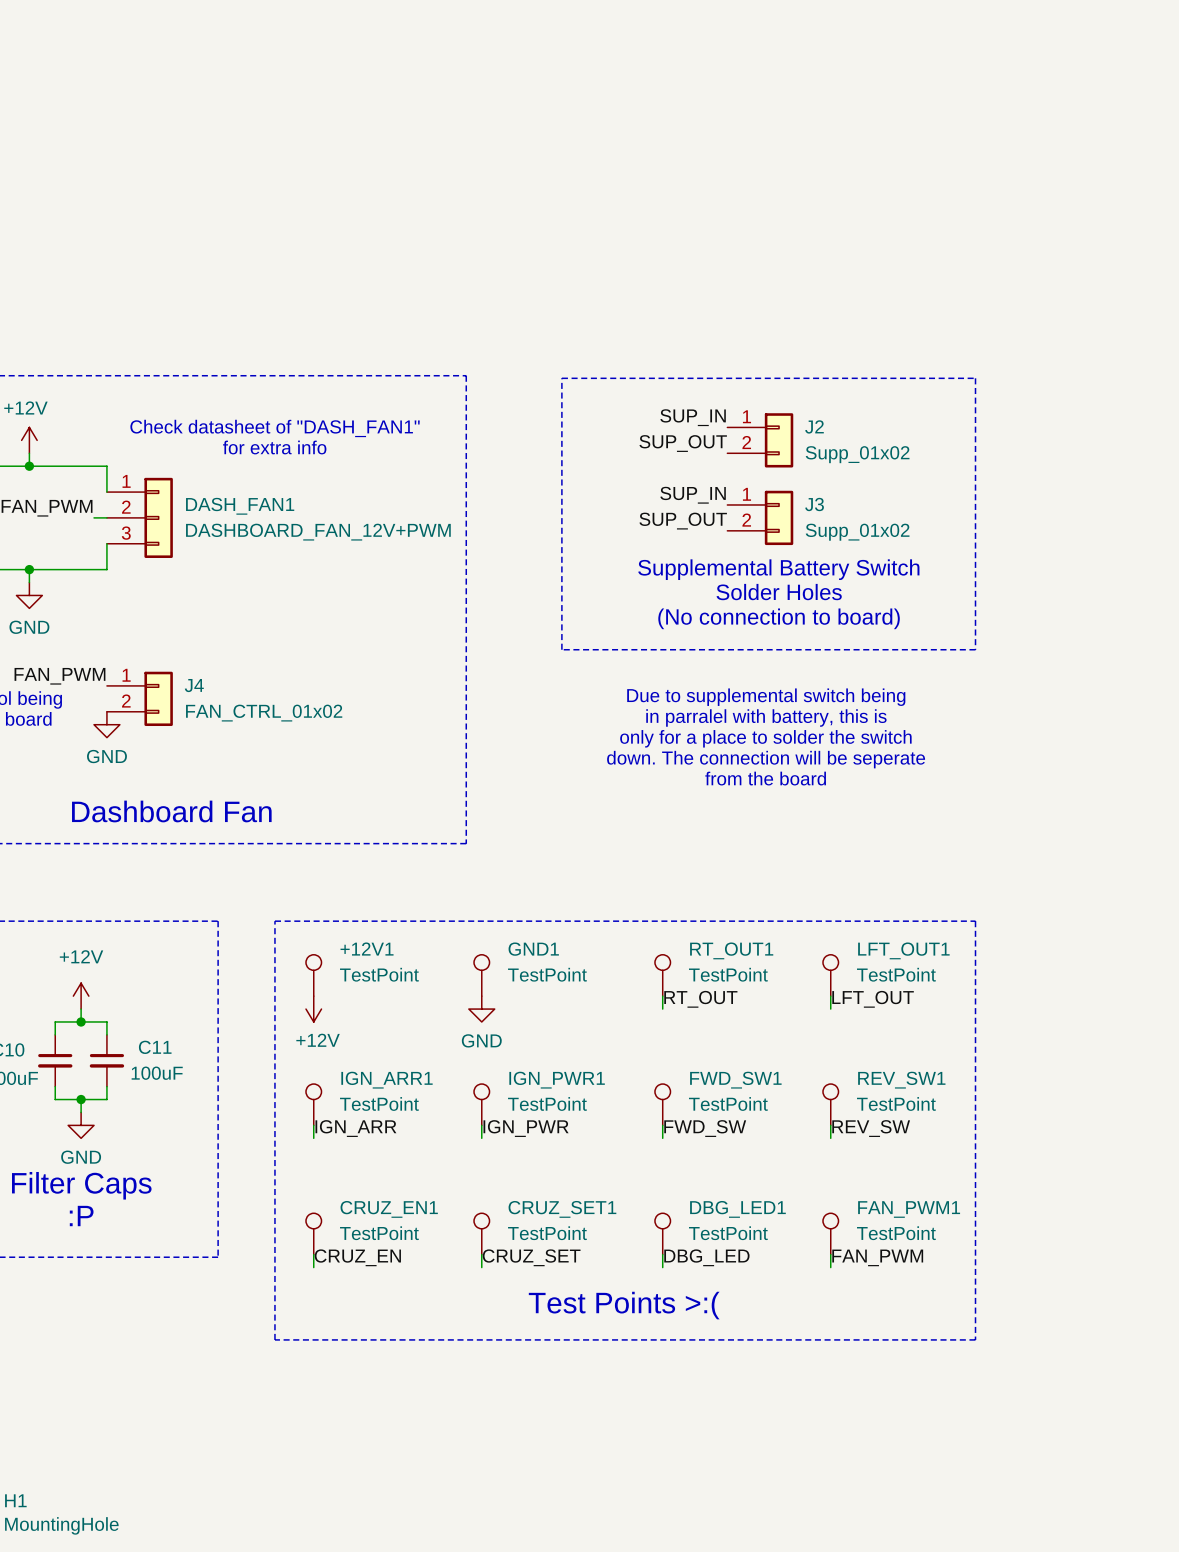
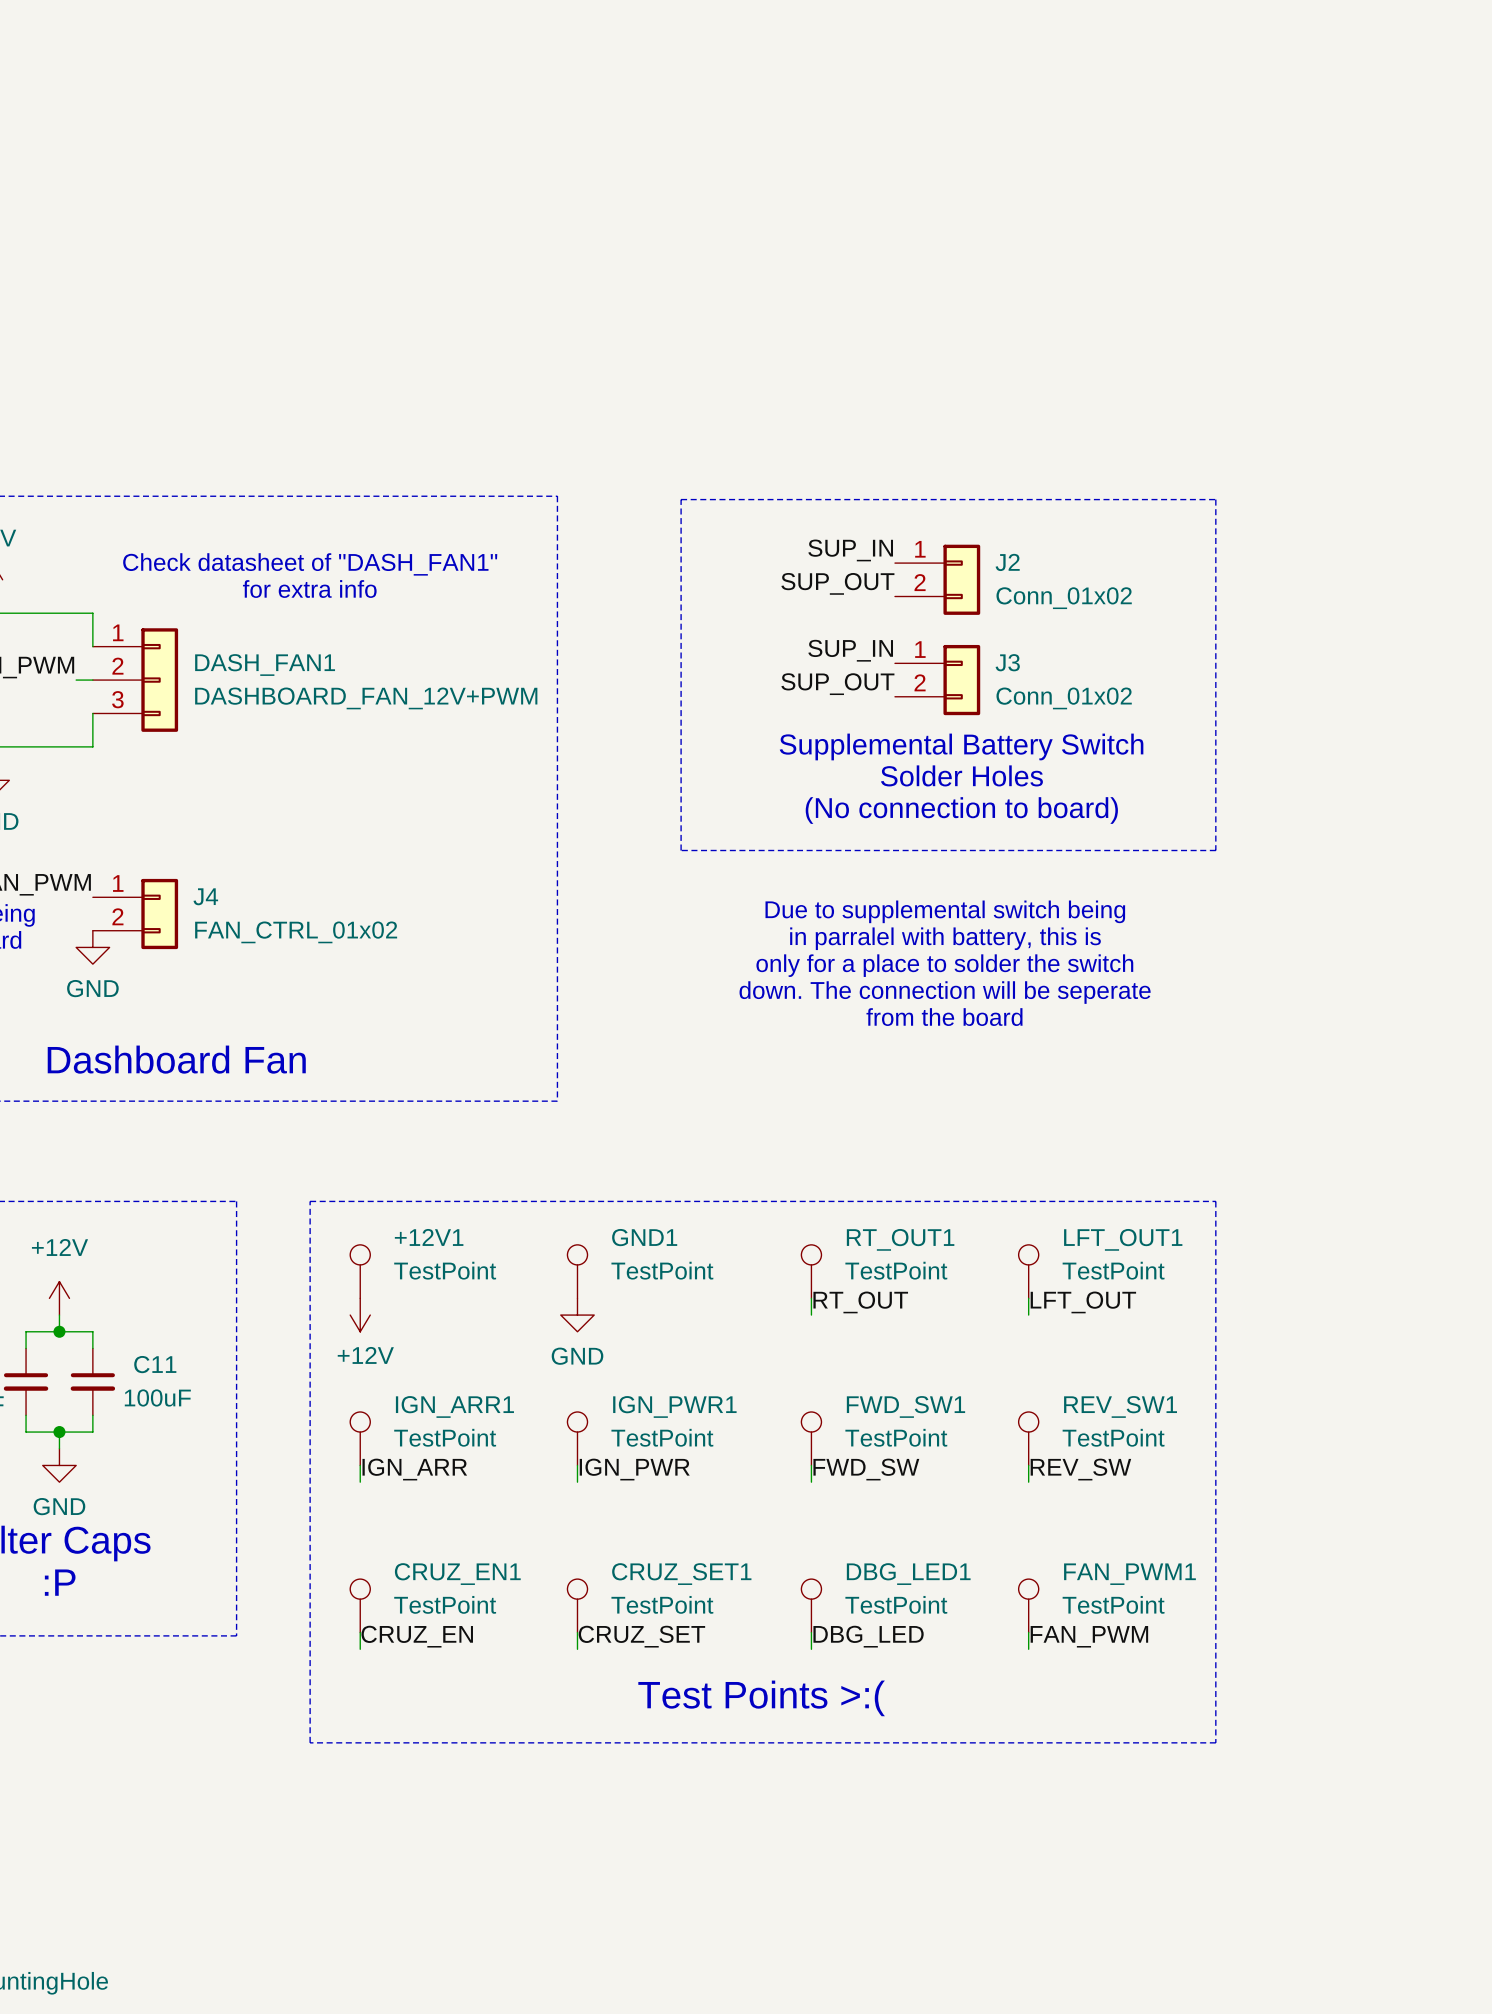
J2 value: Supp_01x02 (857, 454) -> Conn_01x02 (1064, 598)
J3 value: Supp_01x02 (857, 532) -> Conn_01x02 (1064, 698)

